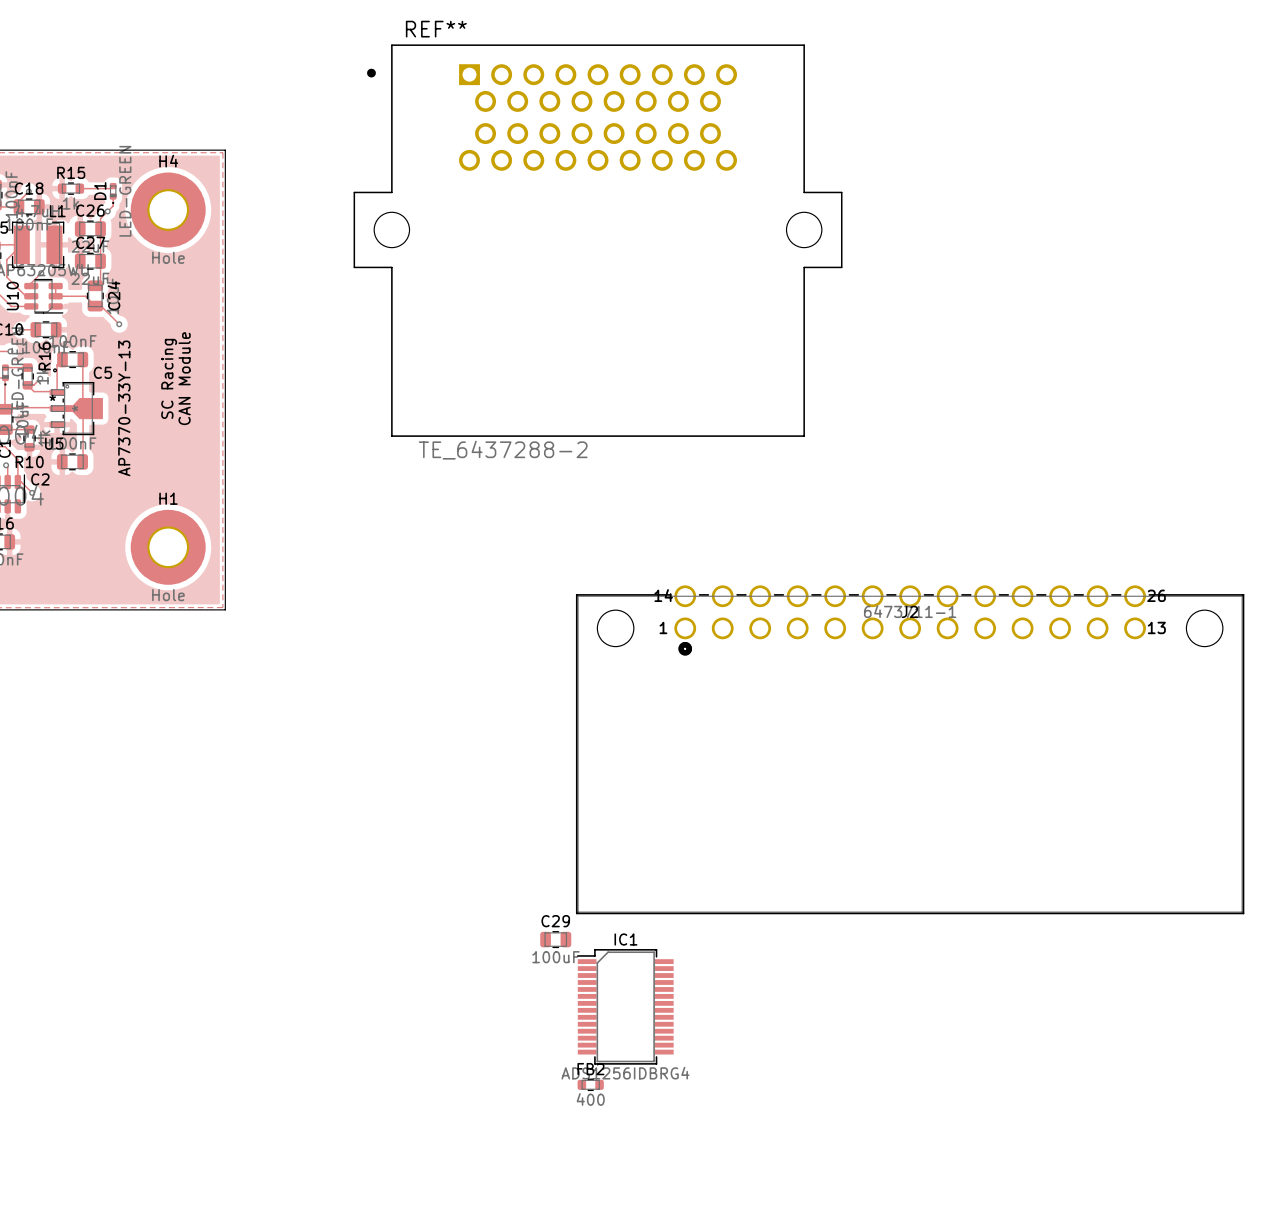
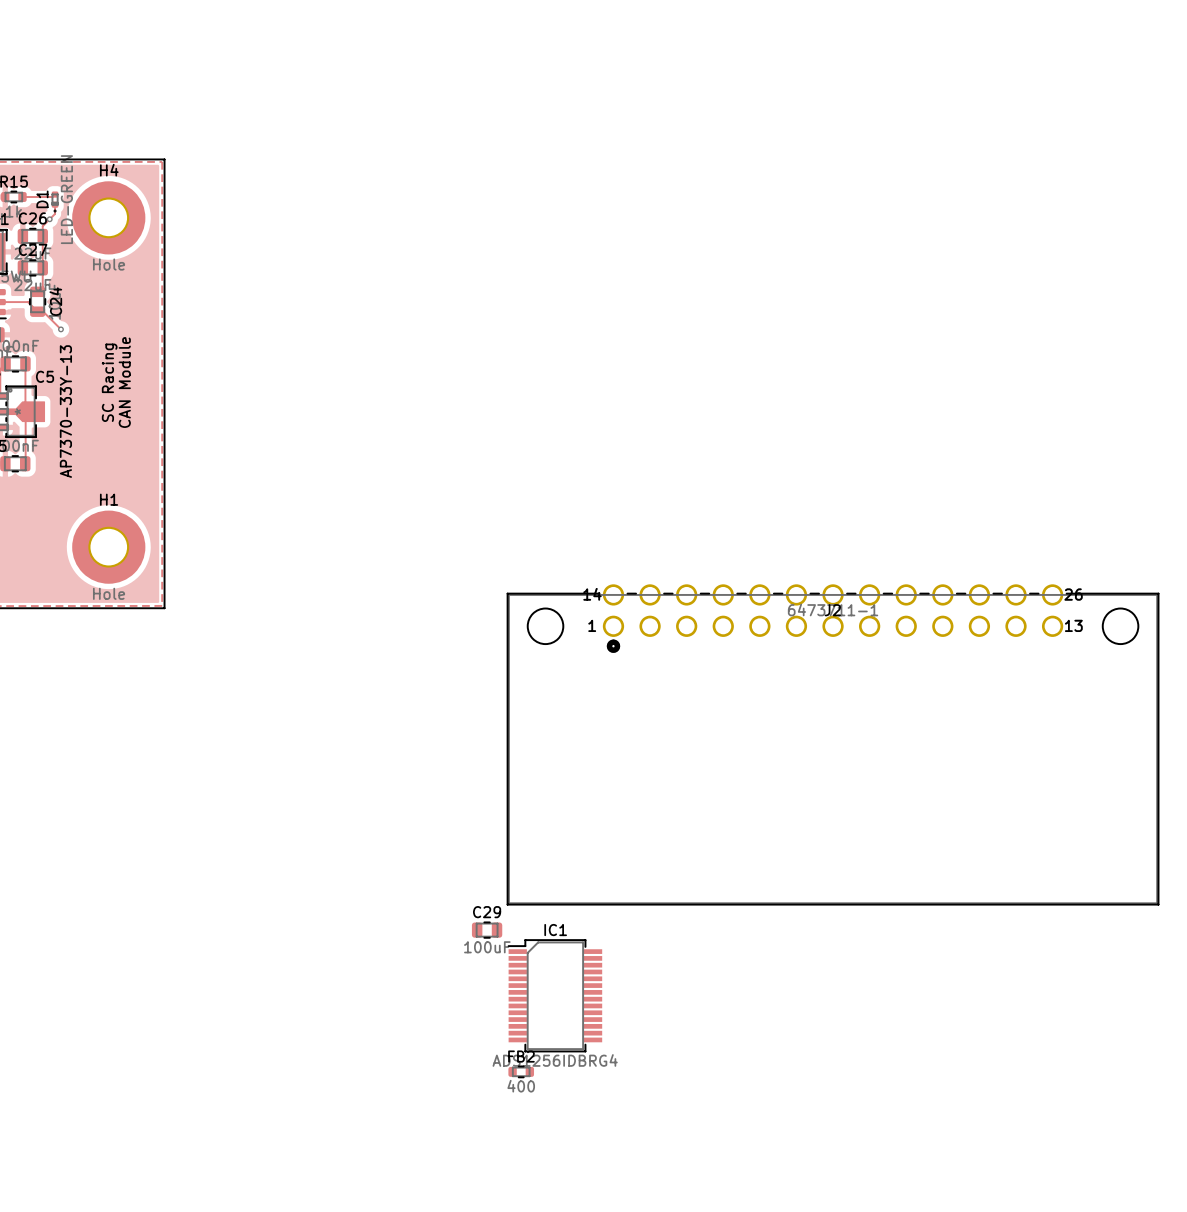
REF**: TE_6437288-2 (598, 240) -> none

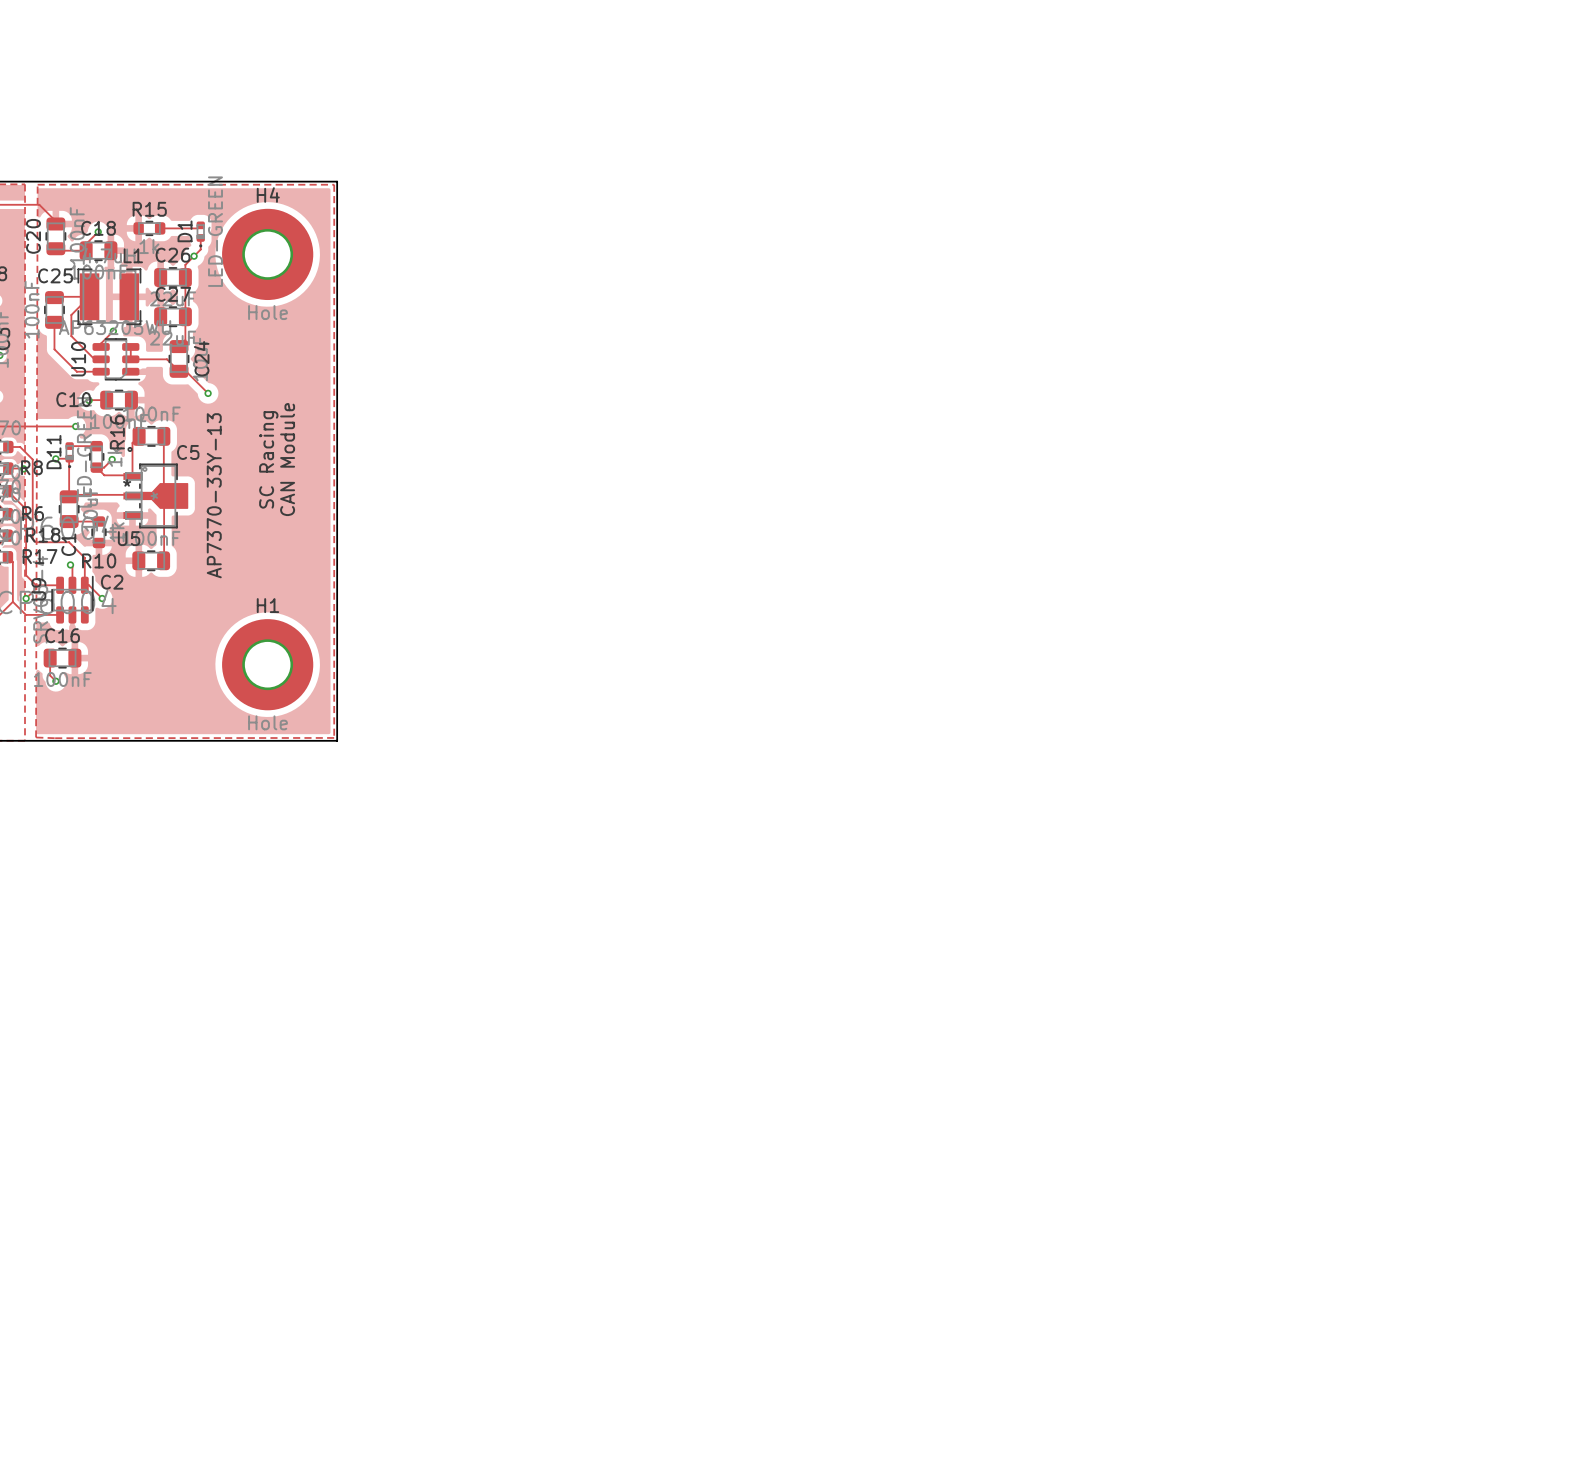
J2: 6473711-1 (833, 744) -> none
C29: 100uF (487, 930) -> none
IC1: ADS1256IDBRG4 (555, 995) -> none
FB2: 400 (521, 1071) -> none

